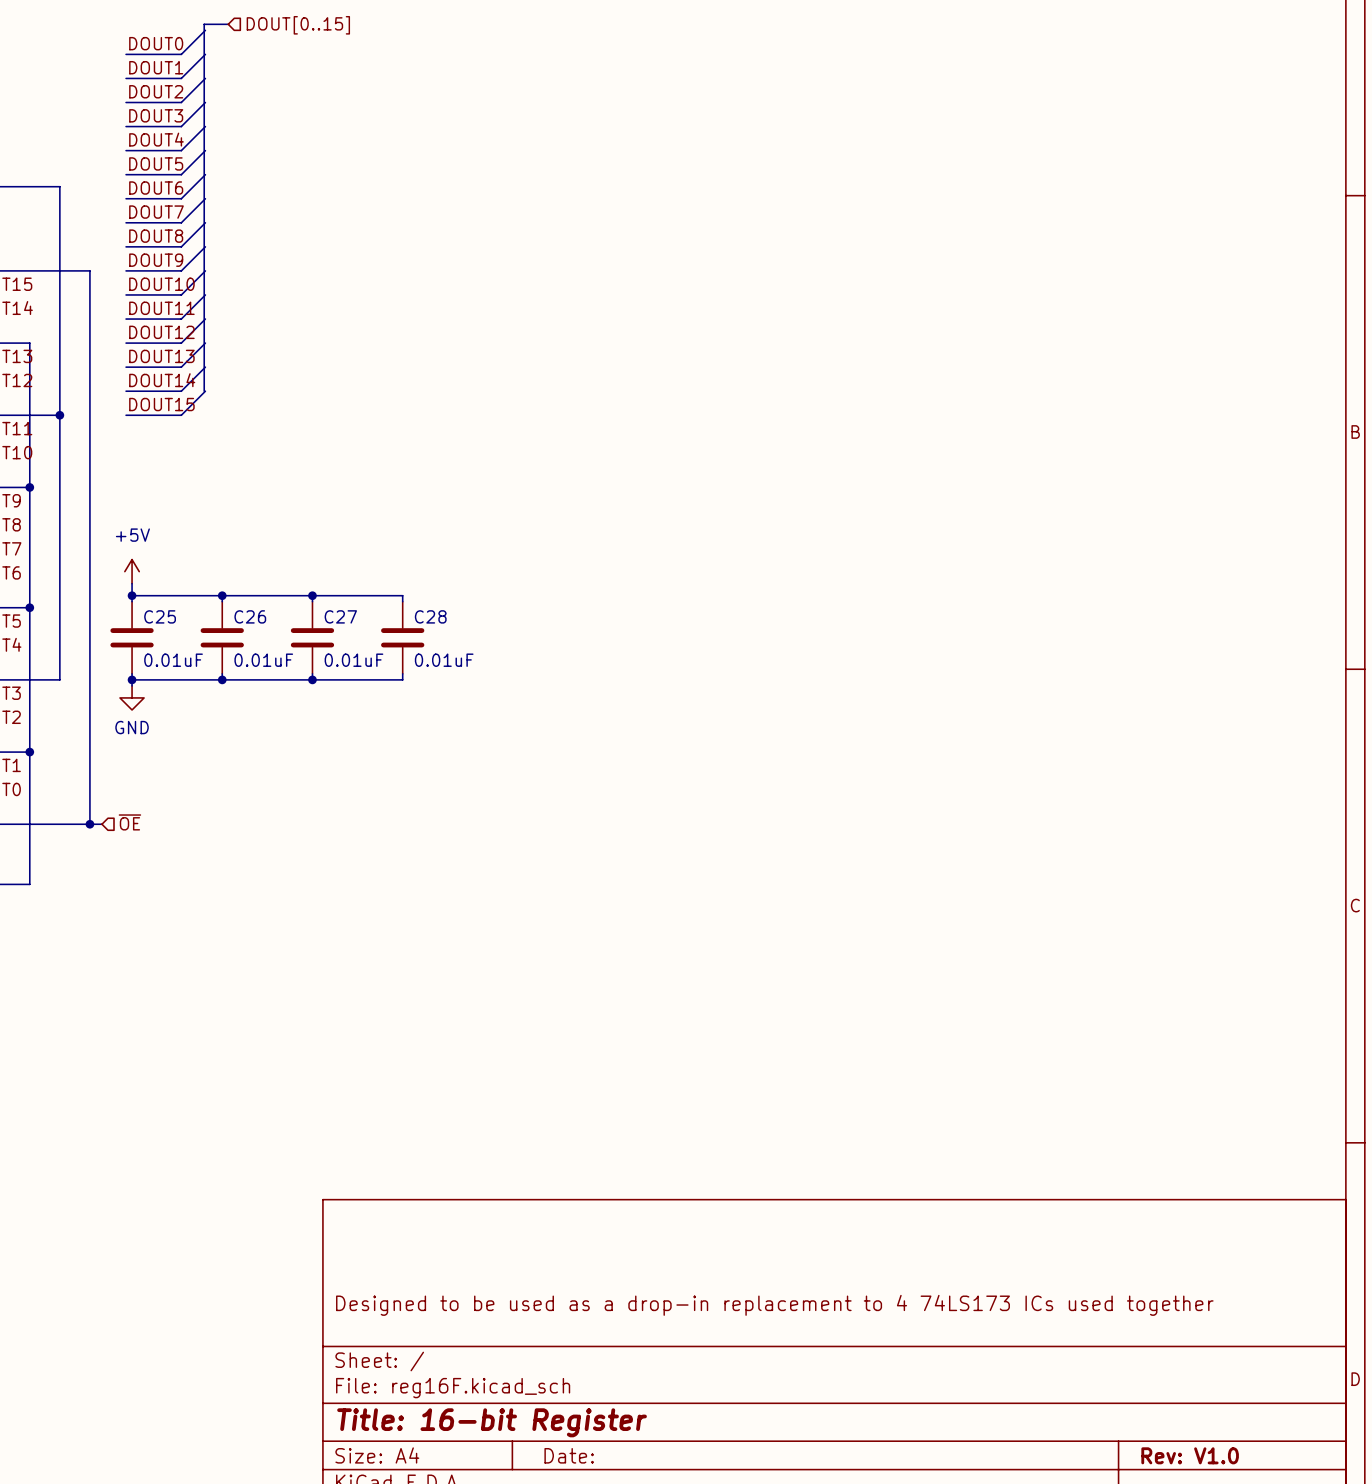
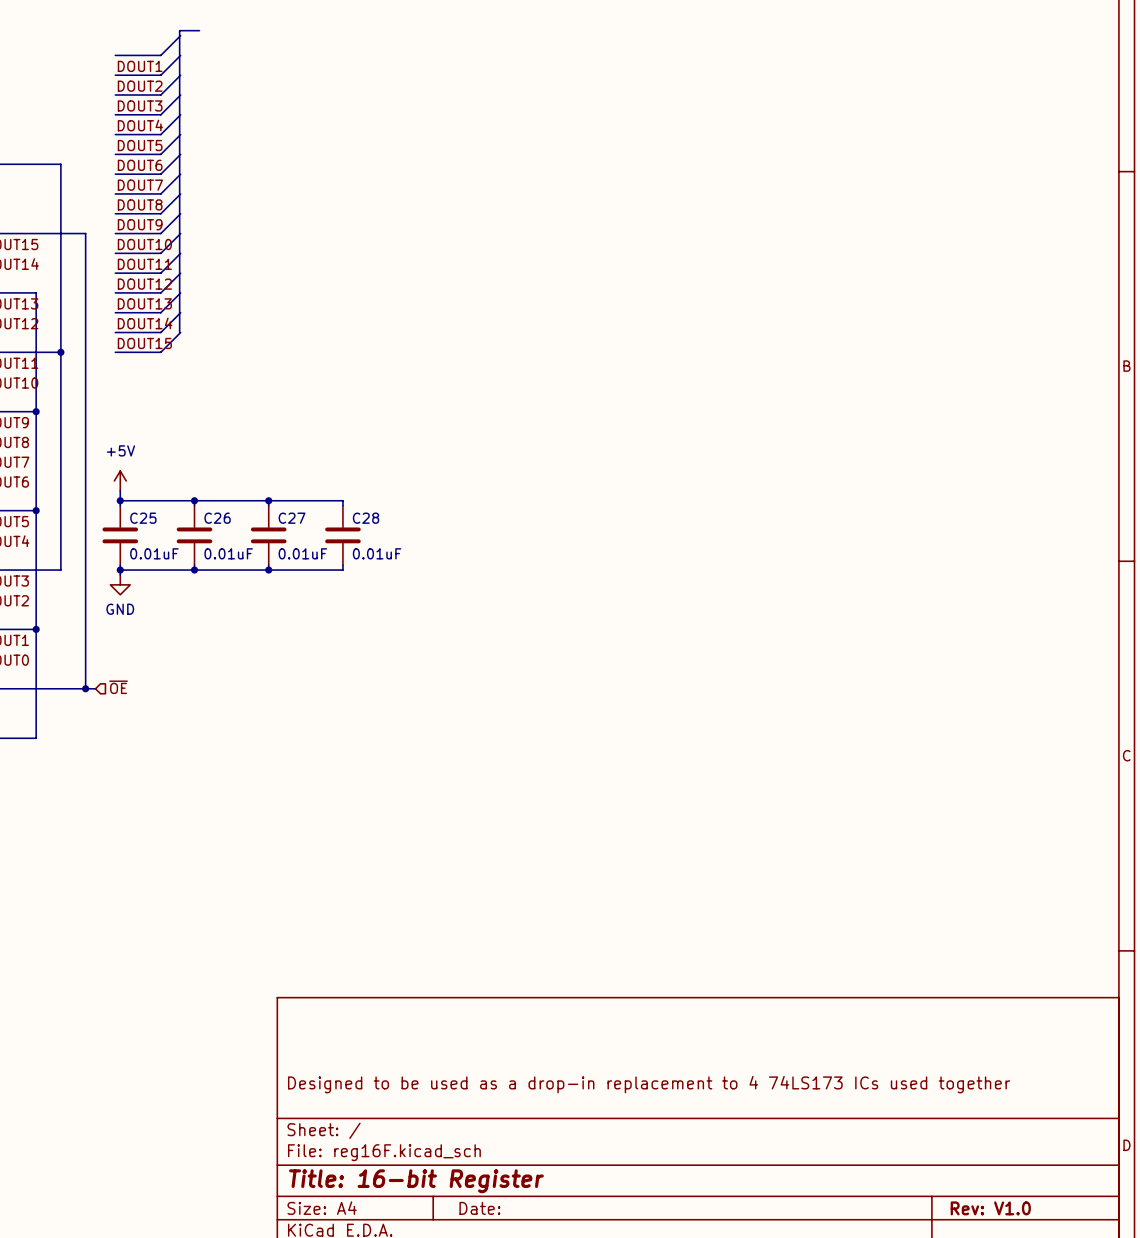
hierarchical label: DOUT[0..15] (298, 25) -> none
label: DOUT0 (156, 43) -> none

